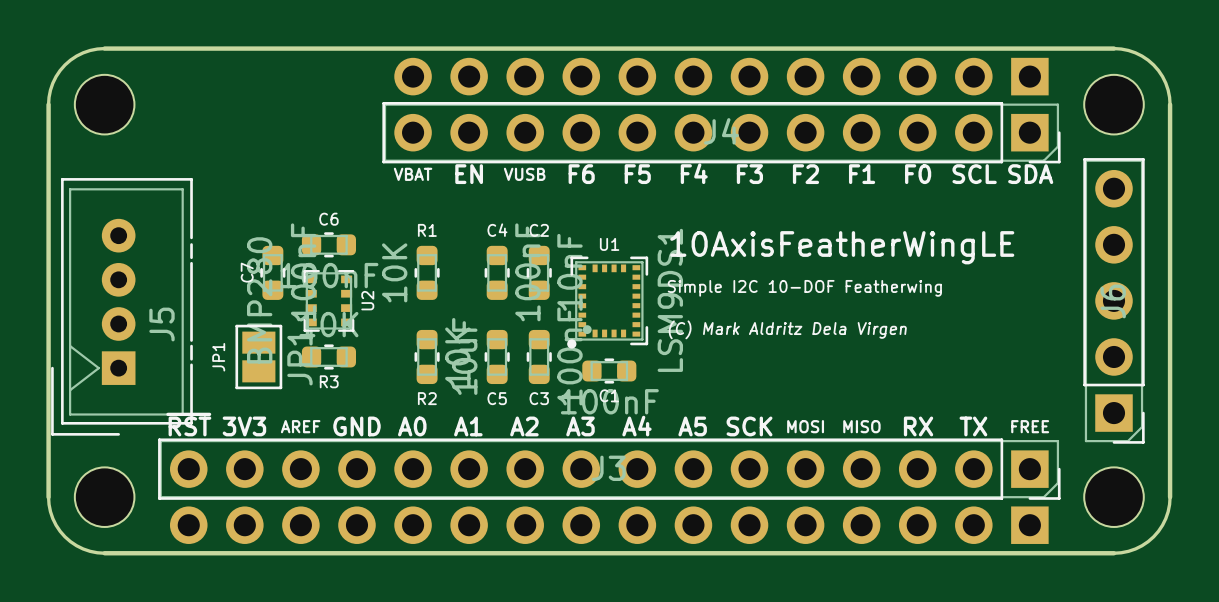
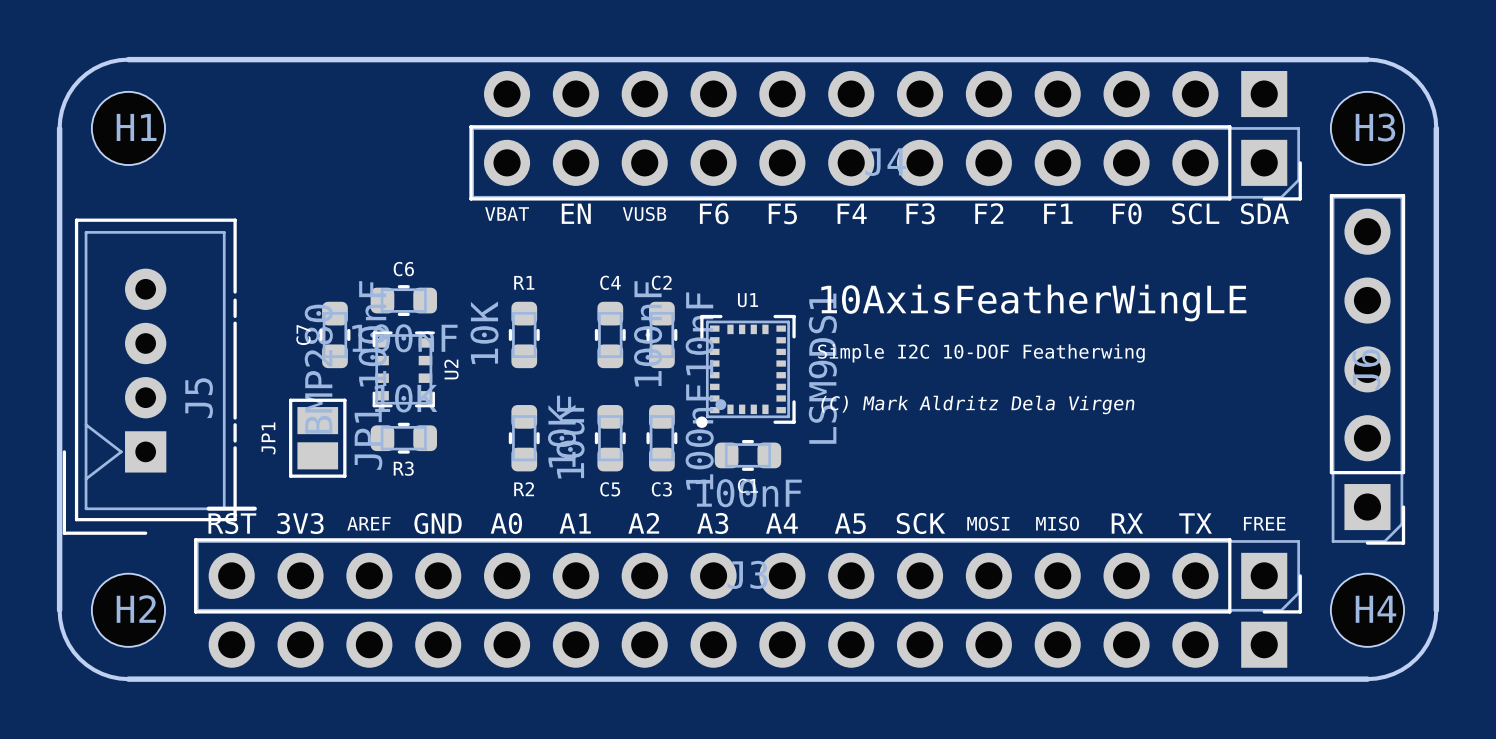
H1 name: none -> H1 (136, 127)
H3 name: none -> H3 (1375, 127)
H4 name: none -> H4 (1375, 609)
H2 name: none -> H2 (136, 609)

